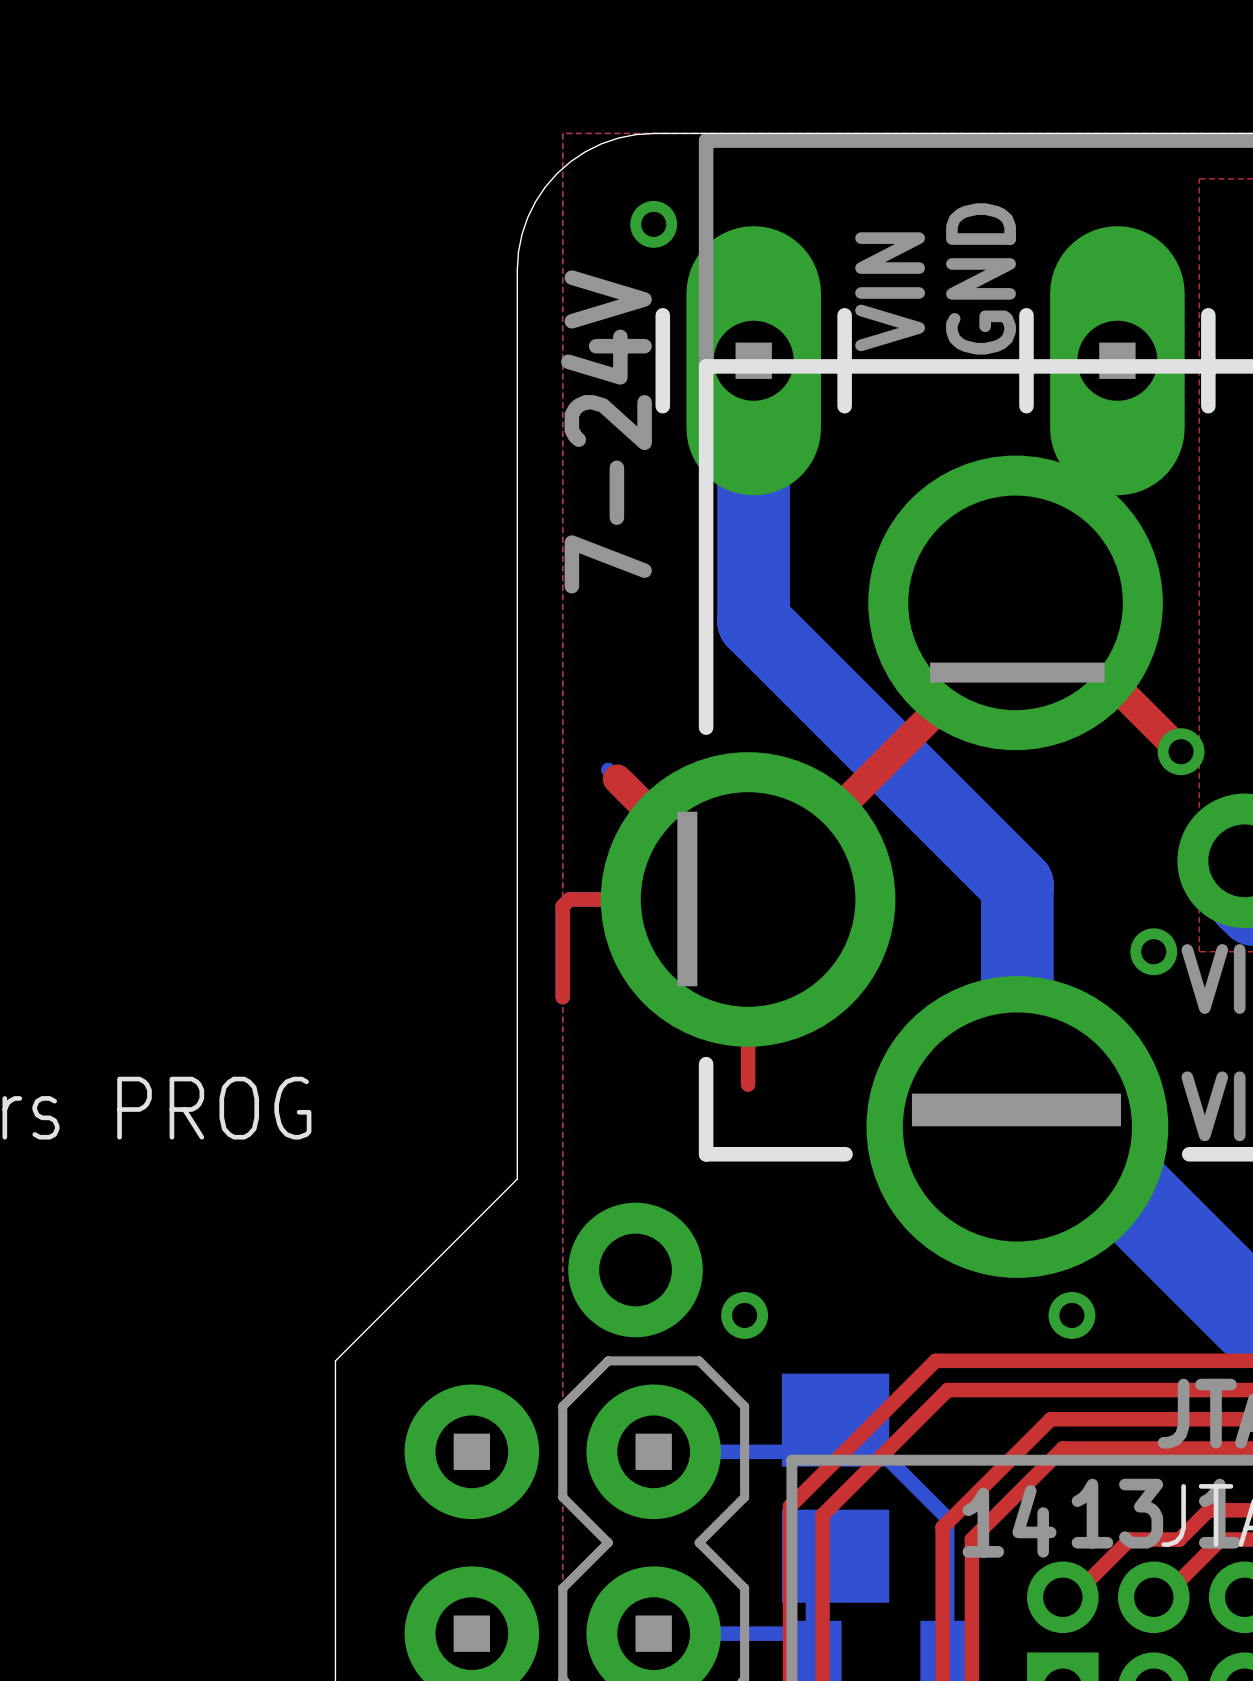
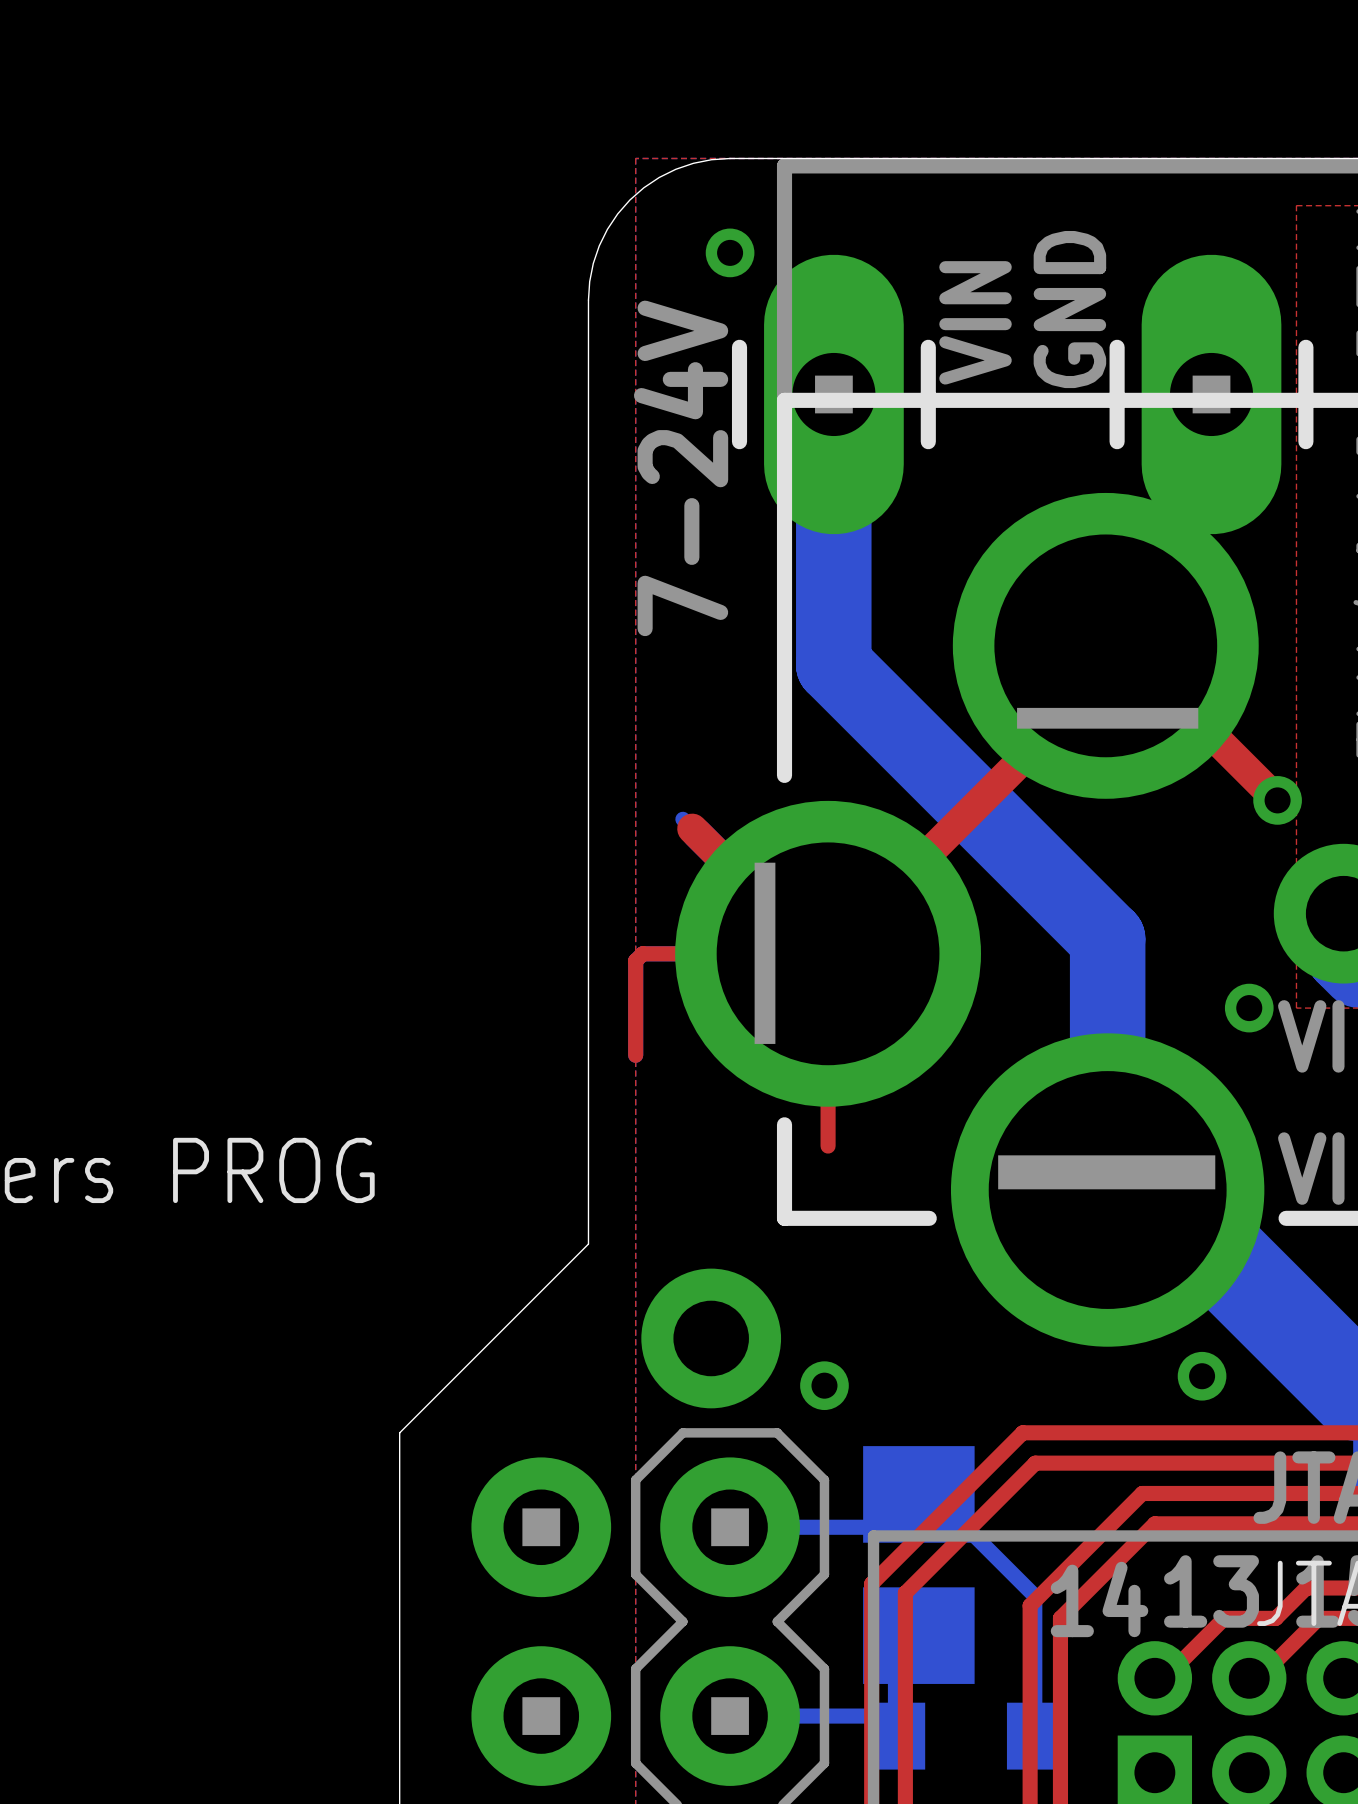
via position: (1071, 1315) -> (1202, 1376)

